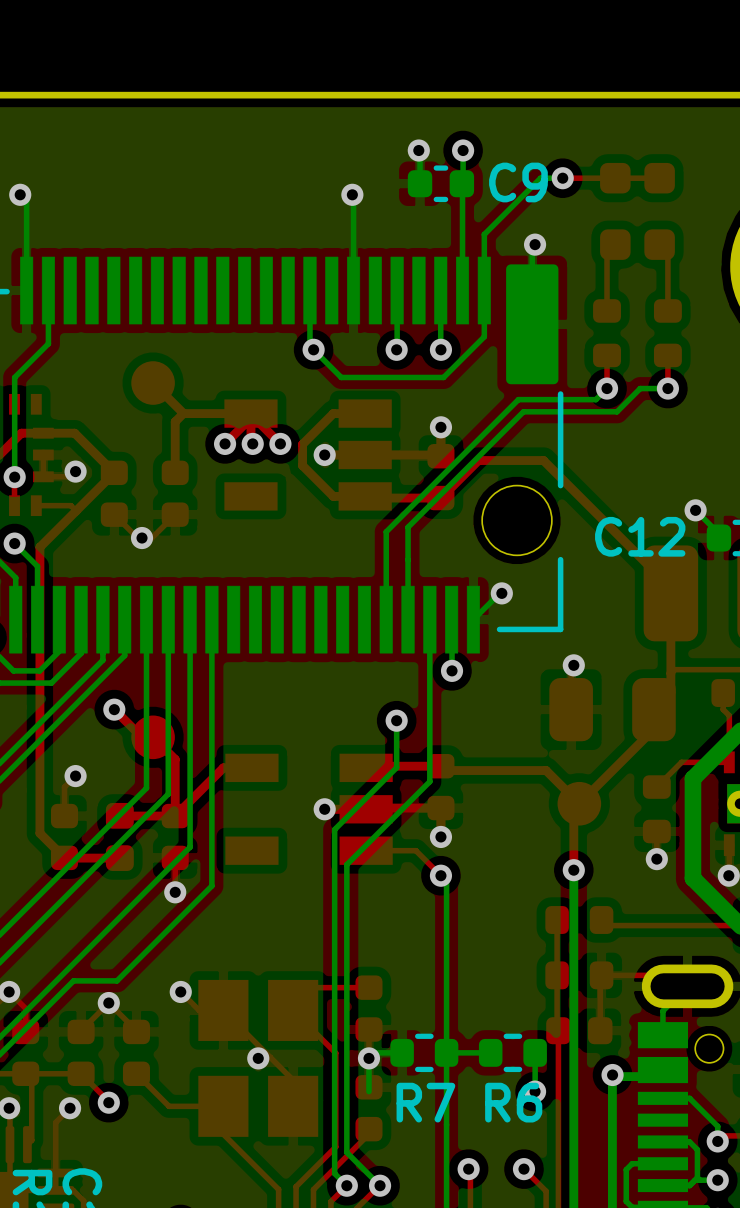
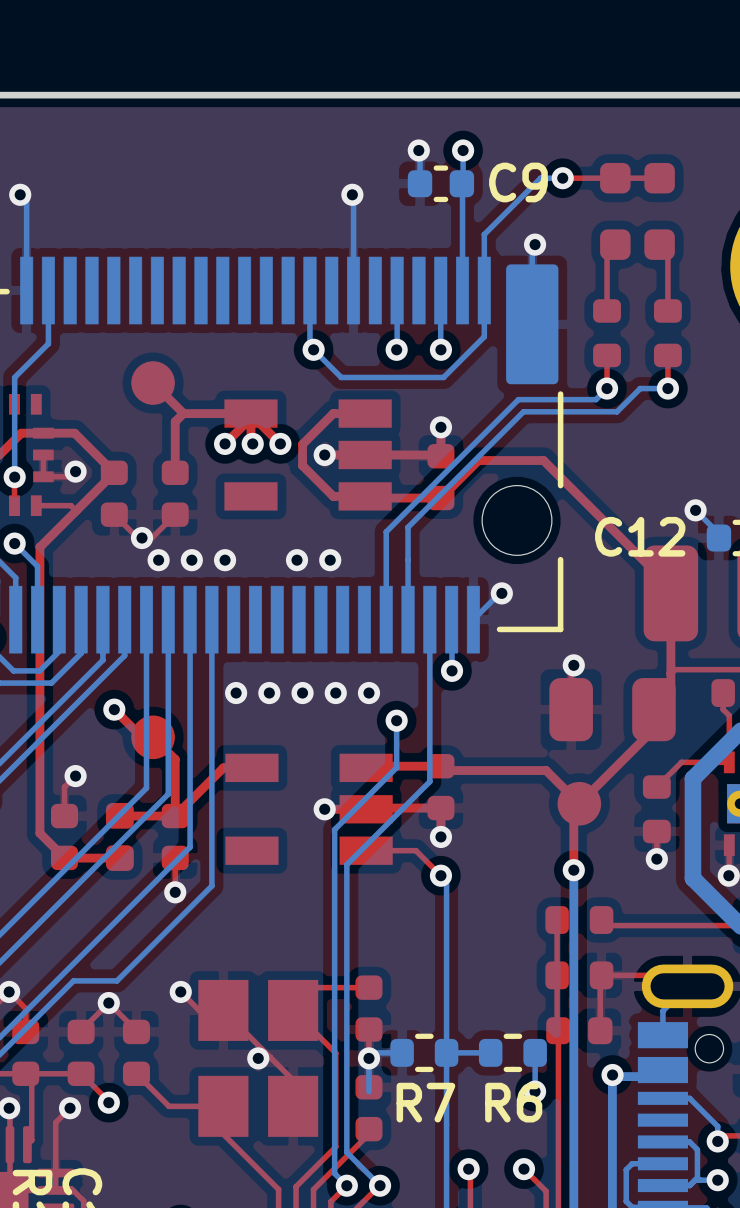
via: none -> (158, 560)
via: none -> (191, 560)
via: none -> (225, 560)
via: none -> (297, 560)
via: none -> (330, 560)
via: none -> (236, 693)
via: none -> (269, 693)
via: none -> (302, 693)
via: none -> (335, 693)
via: none -> (368, 693)

